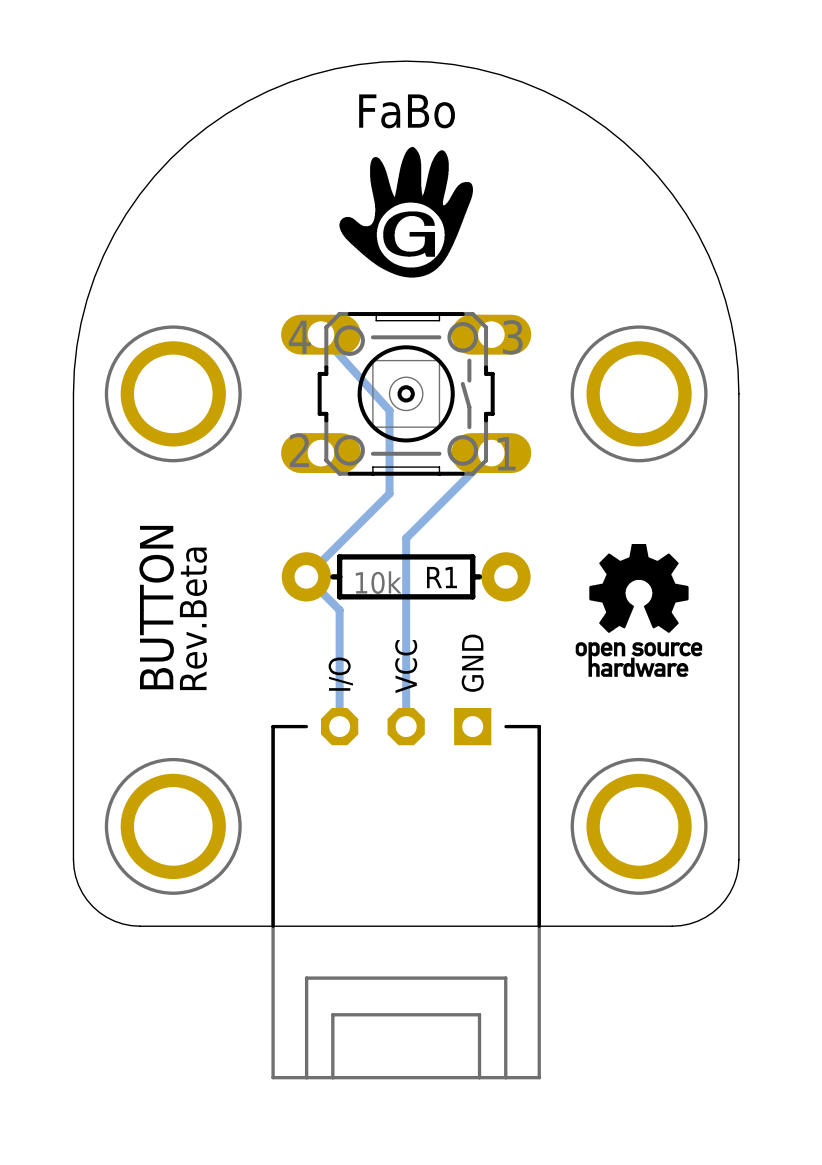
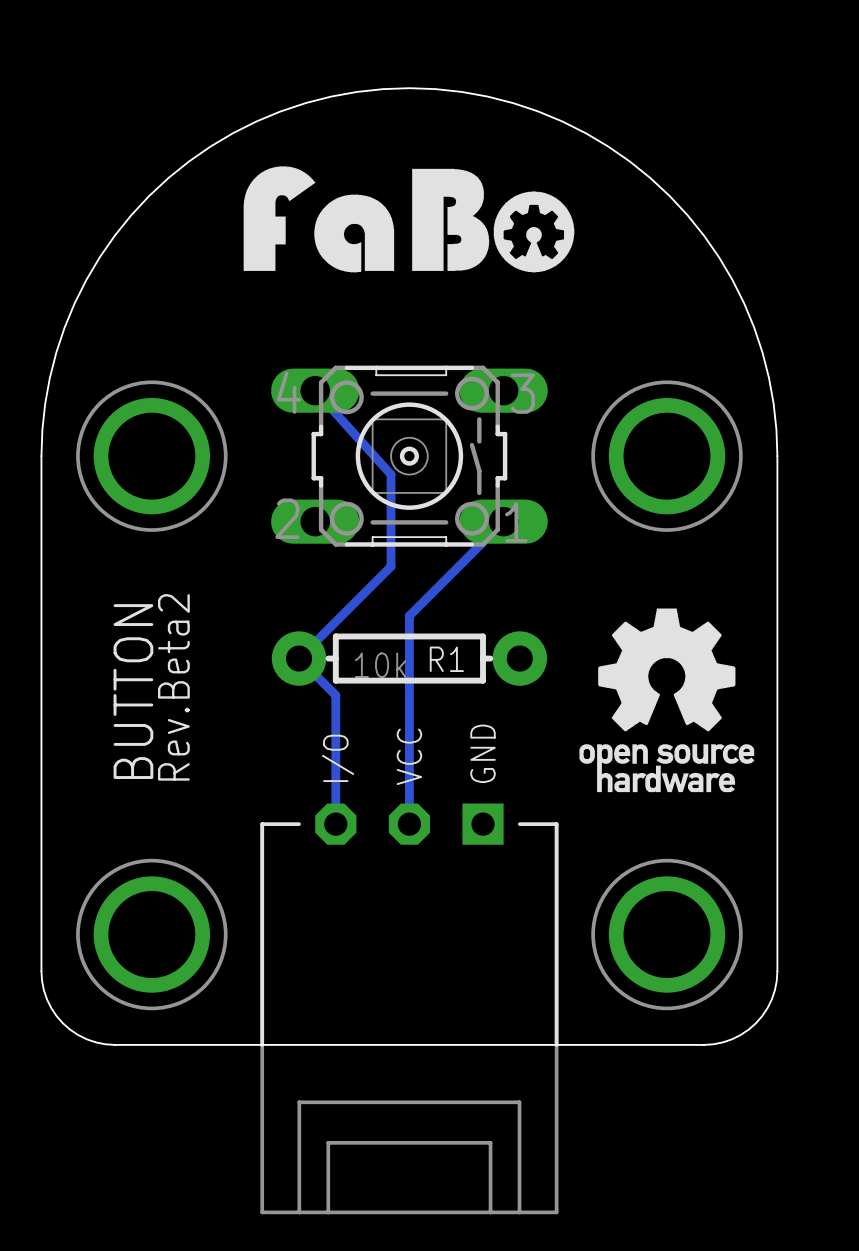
drawing: none -> [243, 166, 575, 273]
drawing: [339, 146, 473, 278] -> none
drawing shape: [575, 544, 703, 677] -> [579, 608, 755, 793]
text: Rev.Beta (193, 618) -> Rev.Beta2 (173, 687)

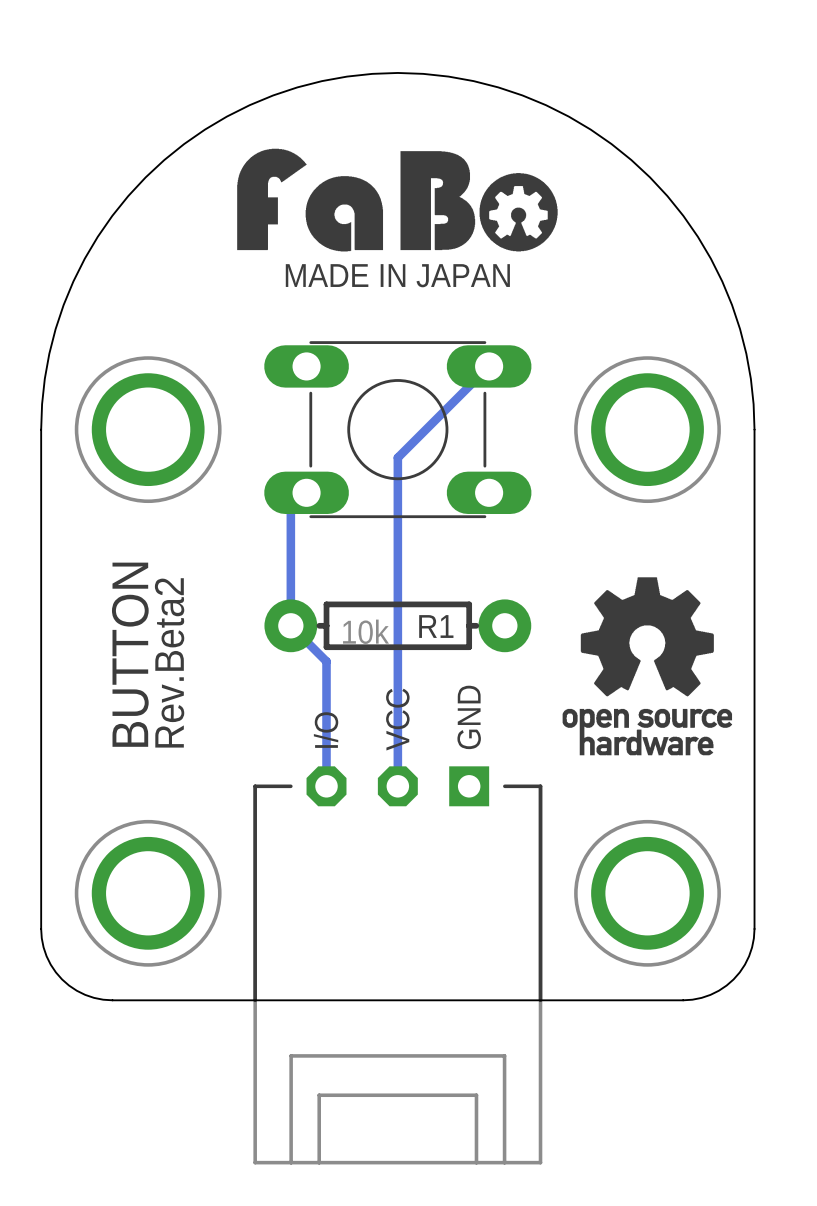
text: none -> MADE IN JAPAN (397, 275)
part footprint: [271, 365, 548, 547] -> [264, 341, 532, 519]
bottom track: (315, 390) (391, 474) (391, 566) (299, 658) -> (306, 492) (290, 508) (290, 625)
bottom track: (503, 521) (409, 615) -> (489, 366) (397, 457) (397, 584)

